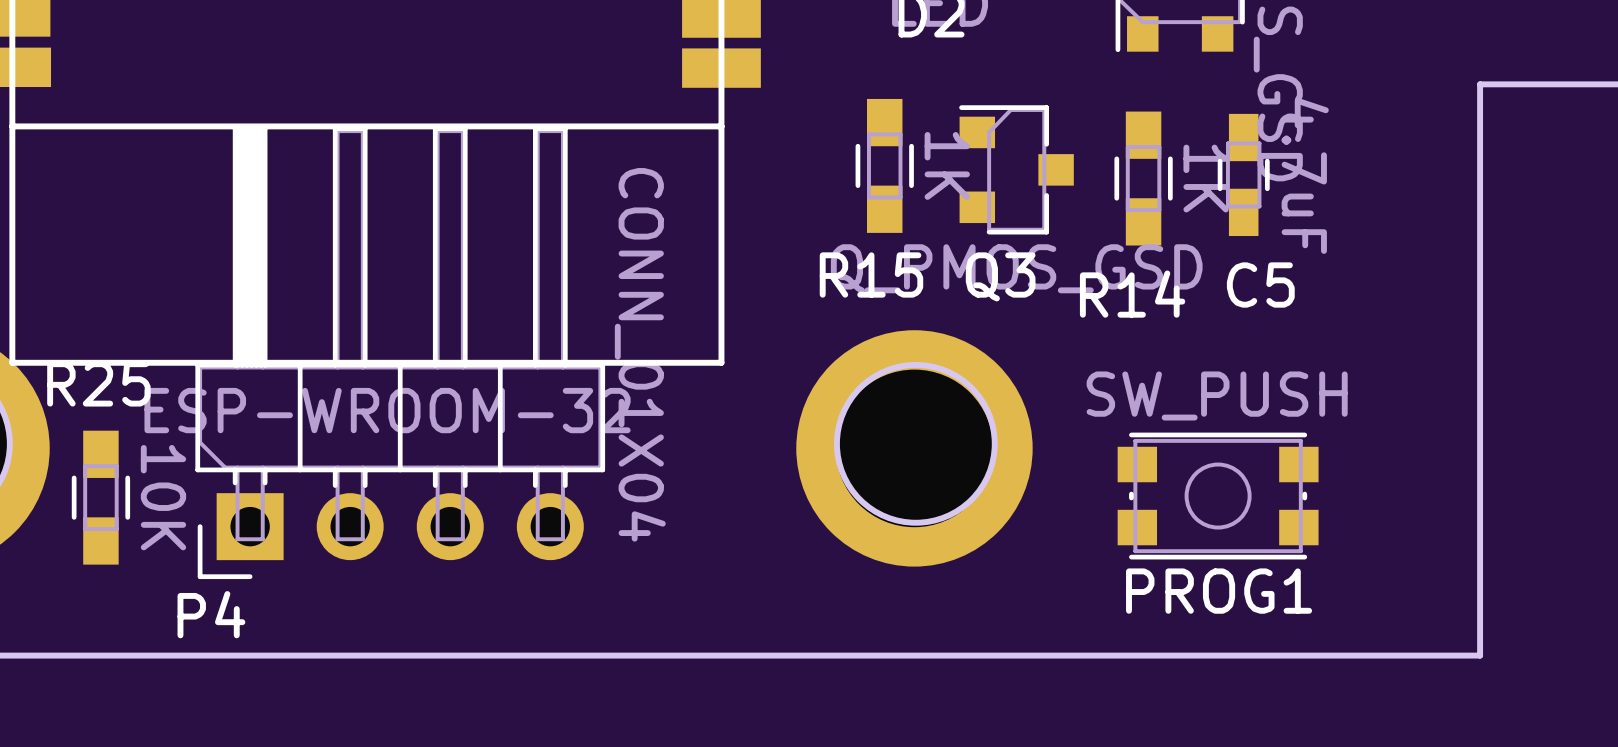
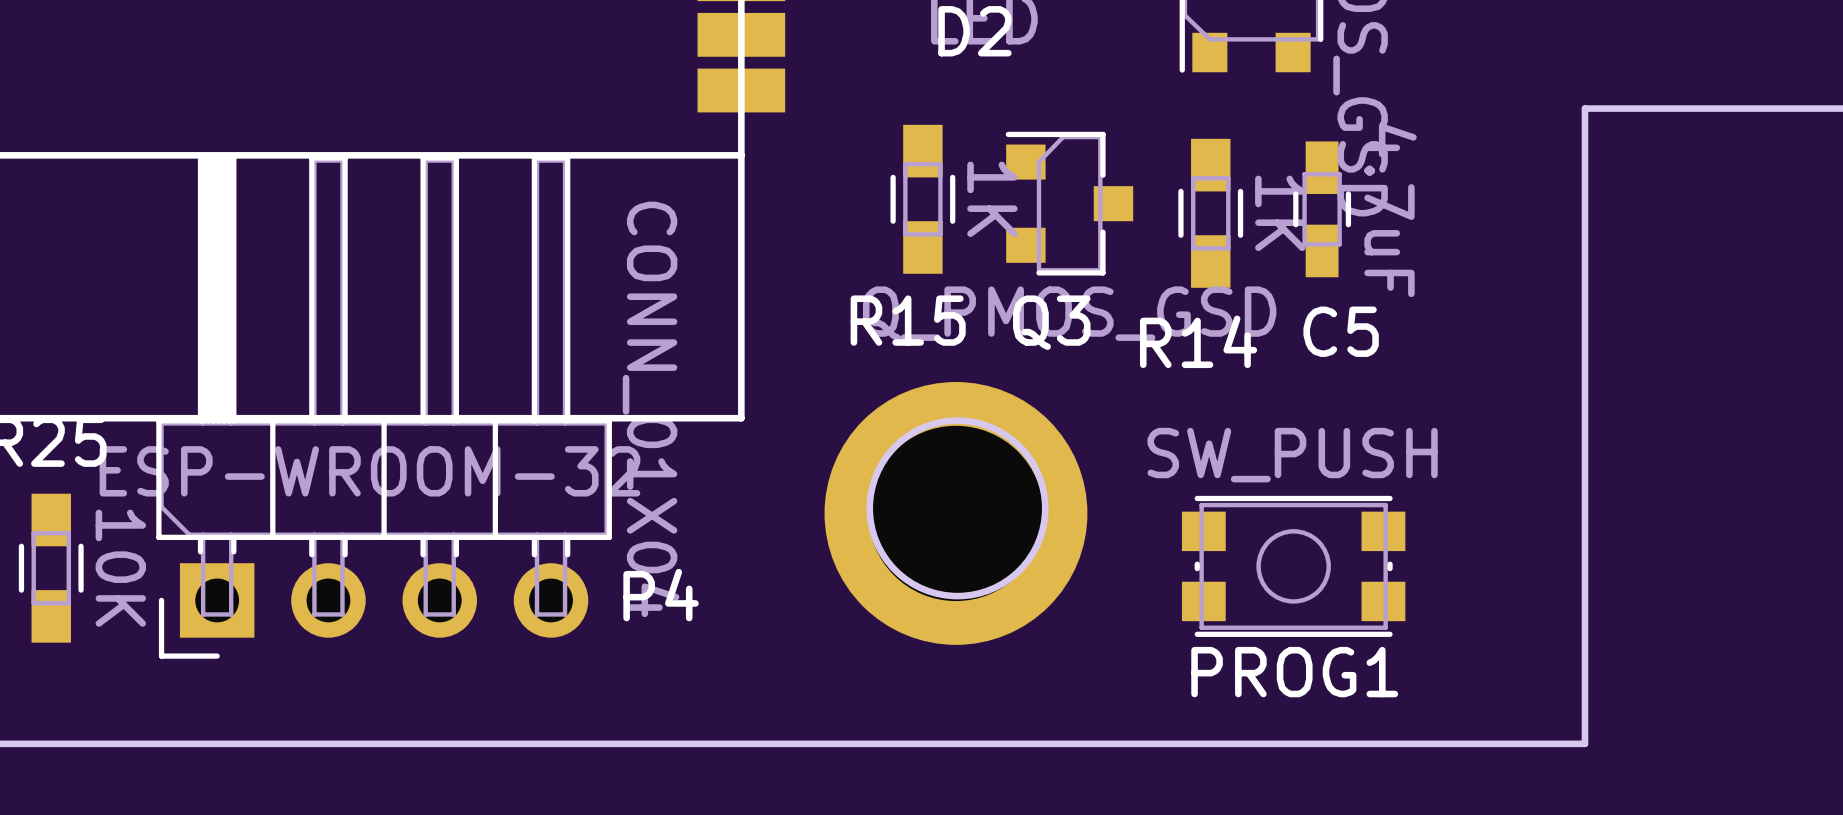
P4 name position: P4 (211, 614) -> P4 (661, 595)

